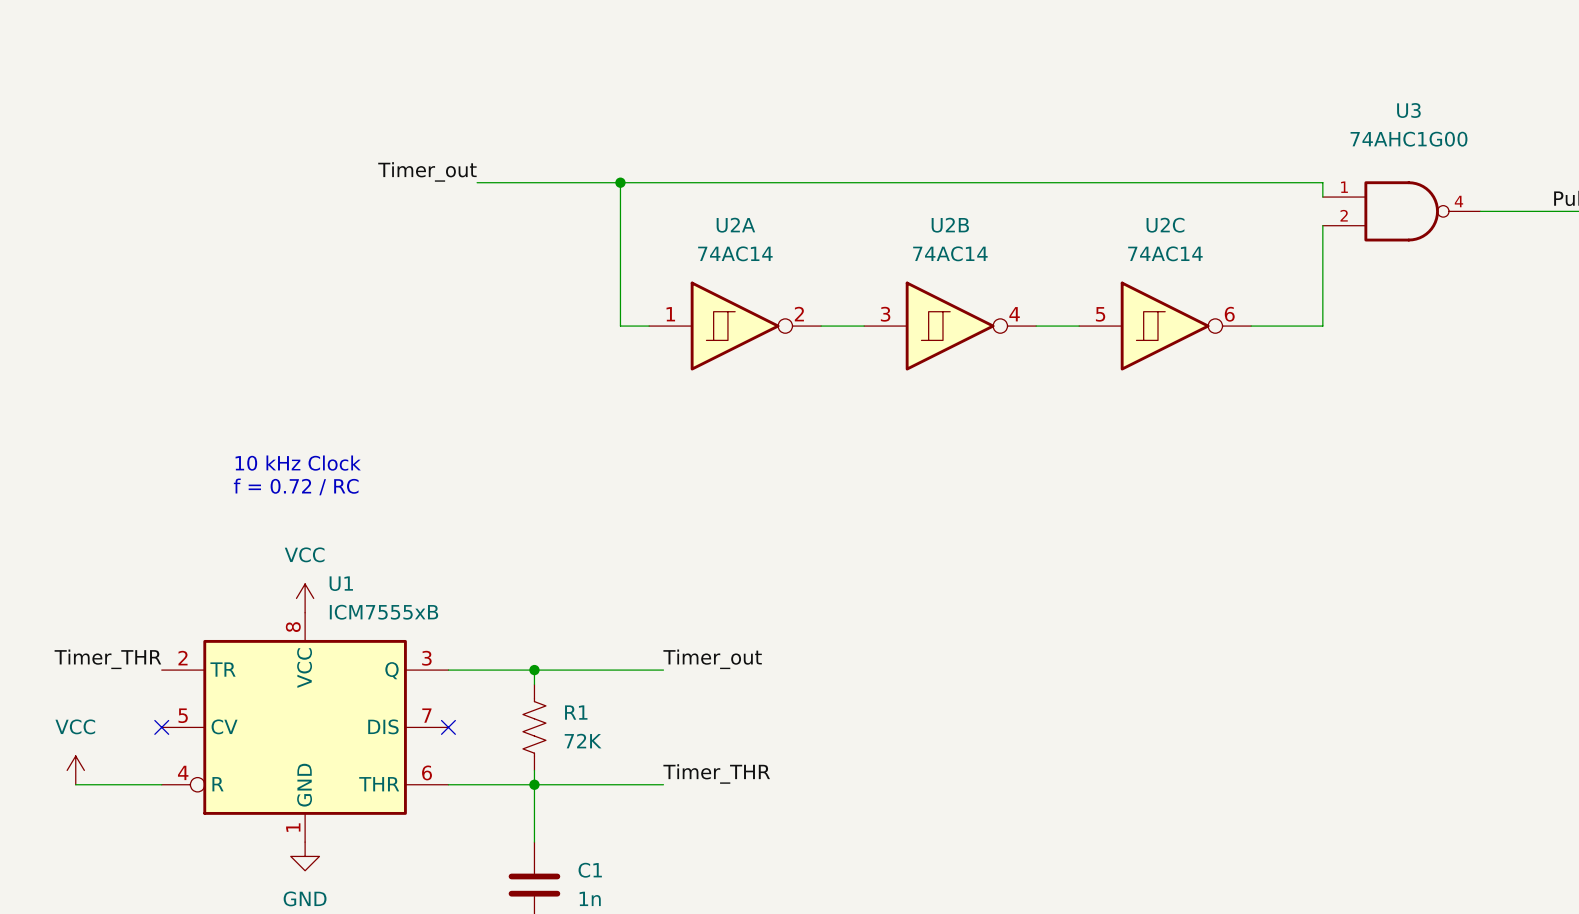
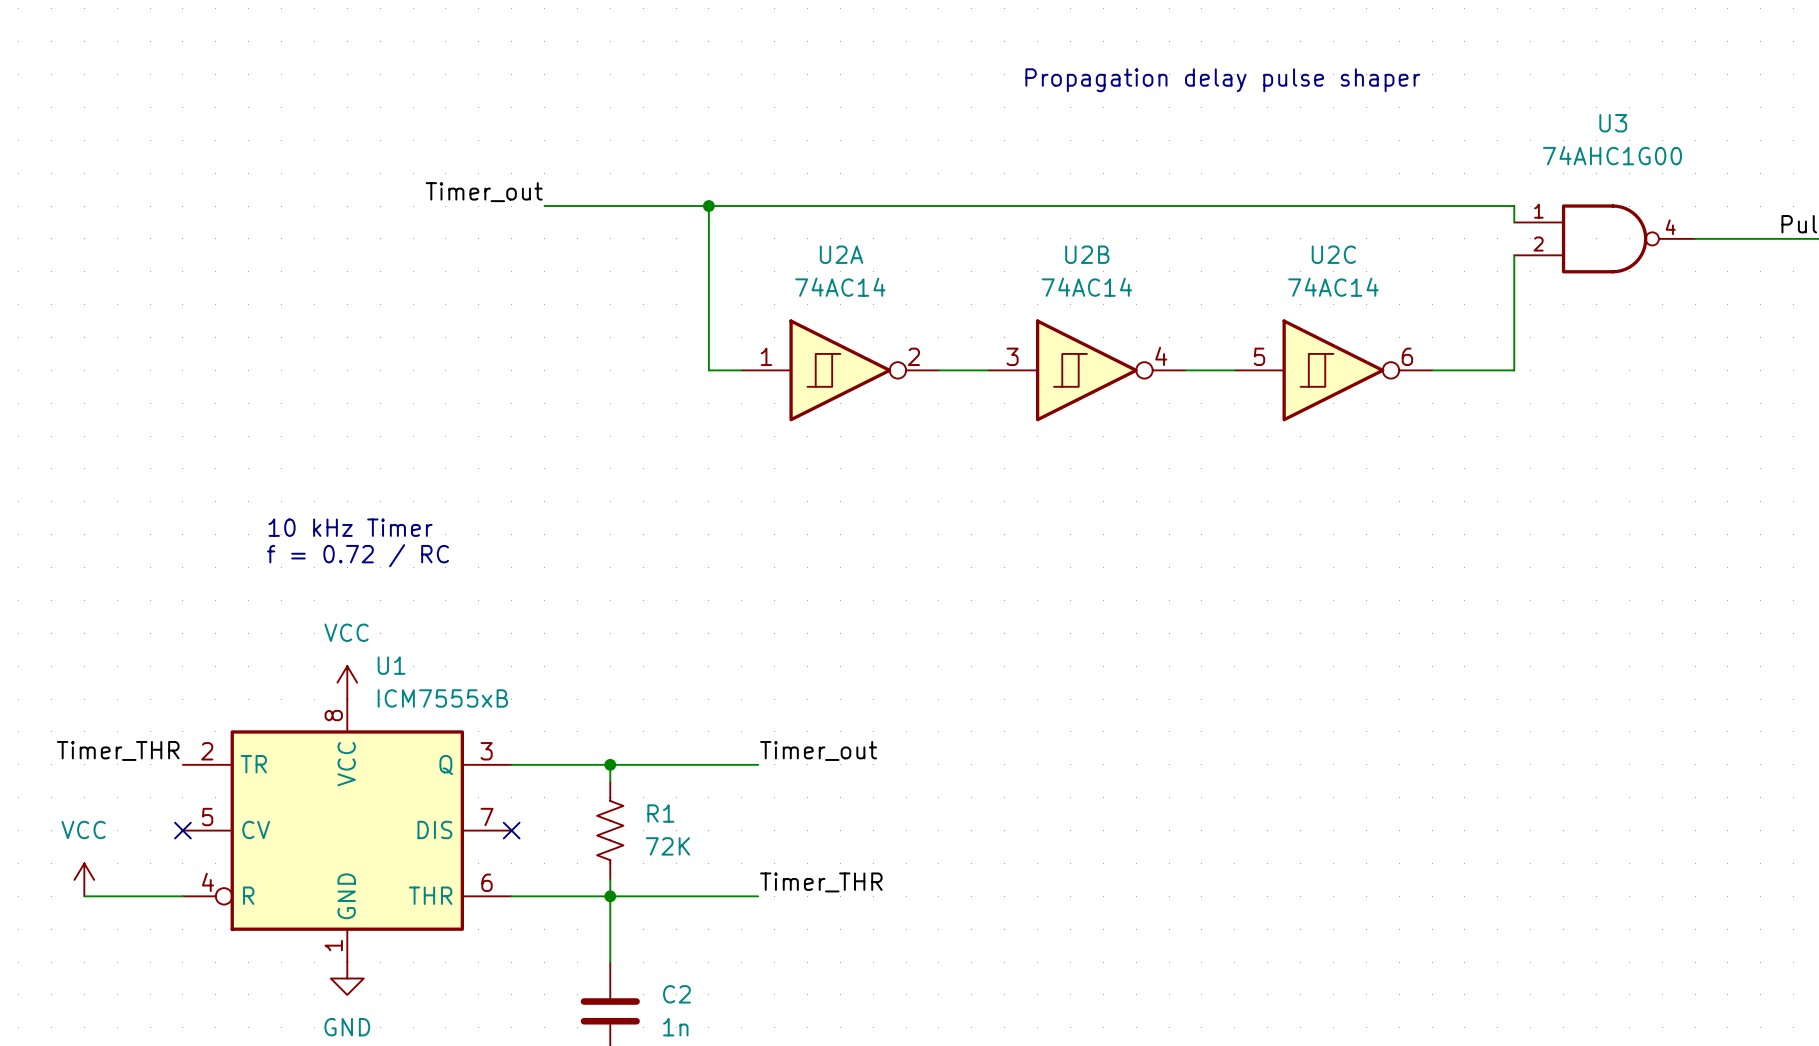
text: none -> Propagation delay pulse shaper (1222, 80)
text: 10 kHz Clock (298, 463) -> 10 kHz Timer (350, 527)
C1 name: C1 (590, 870) -> C2 (676, 994)

